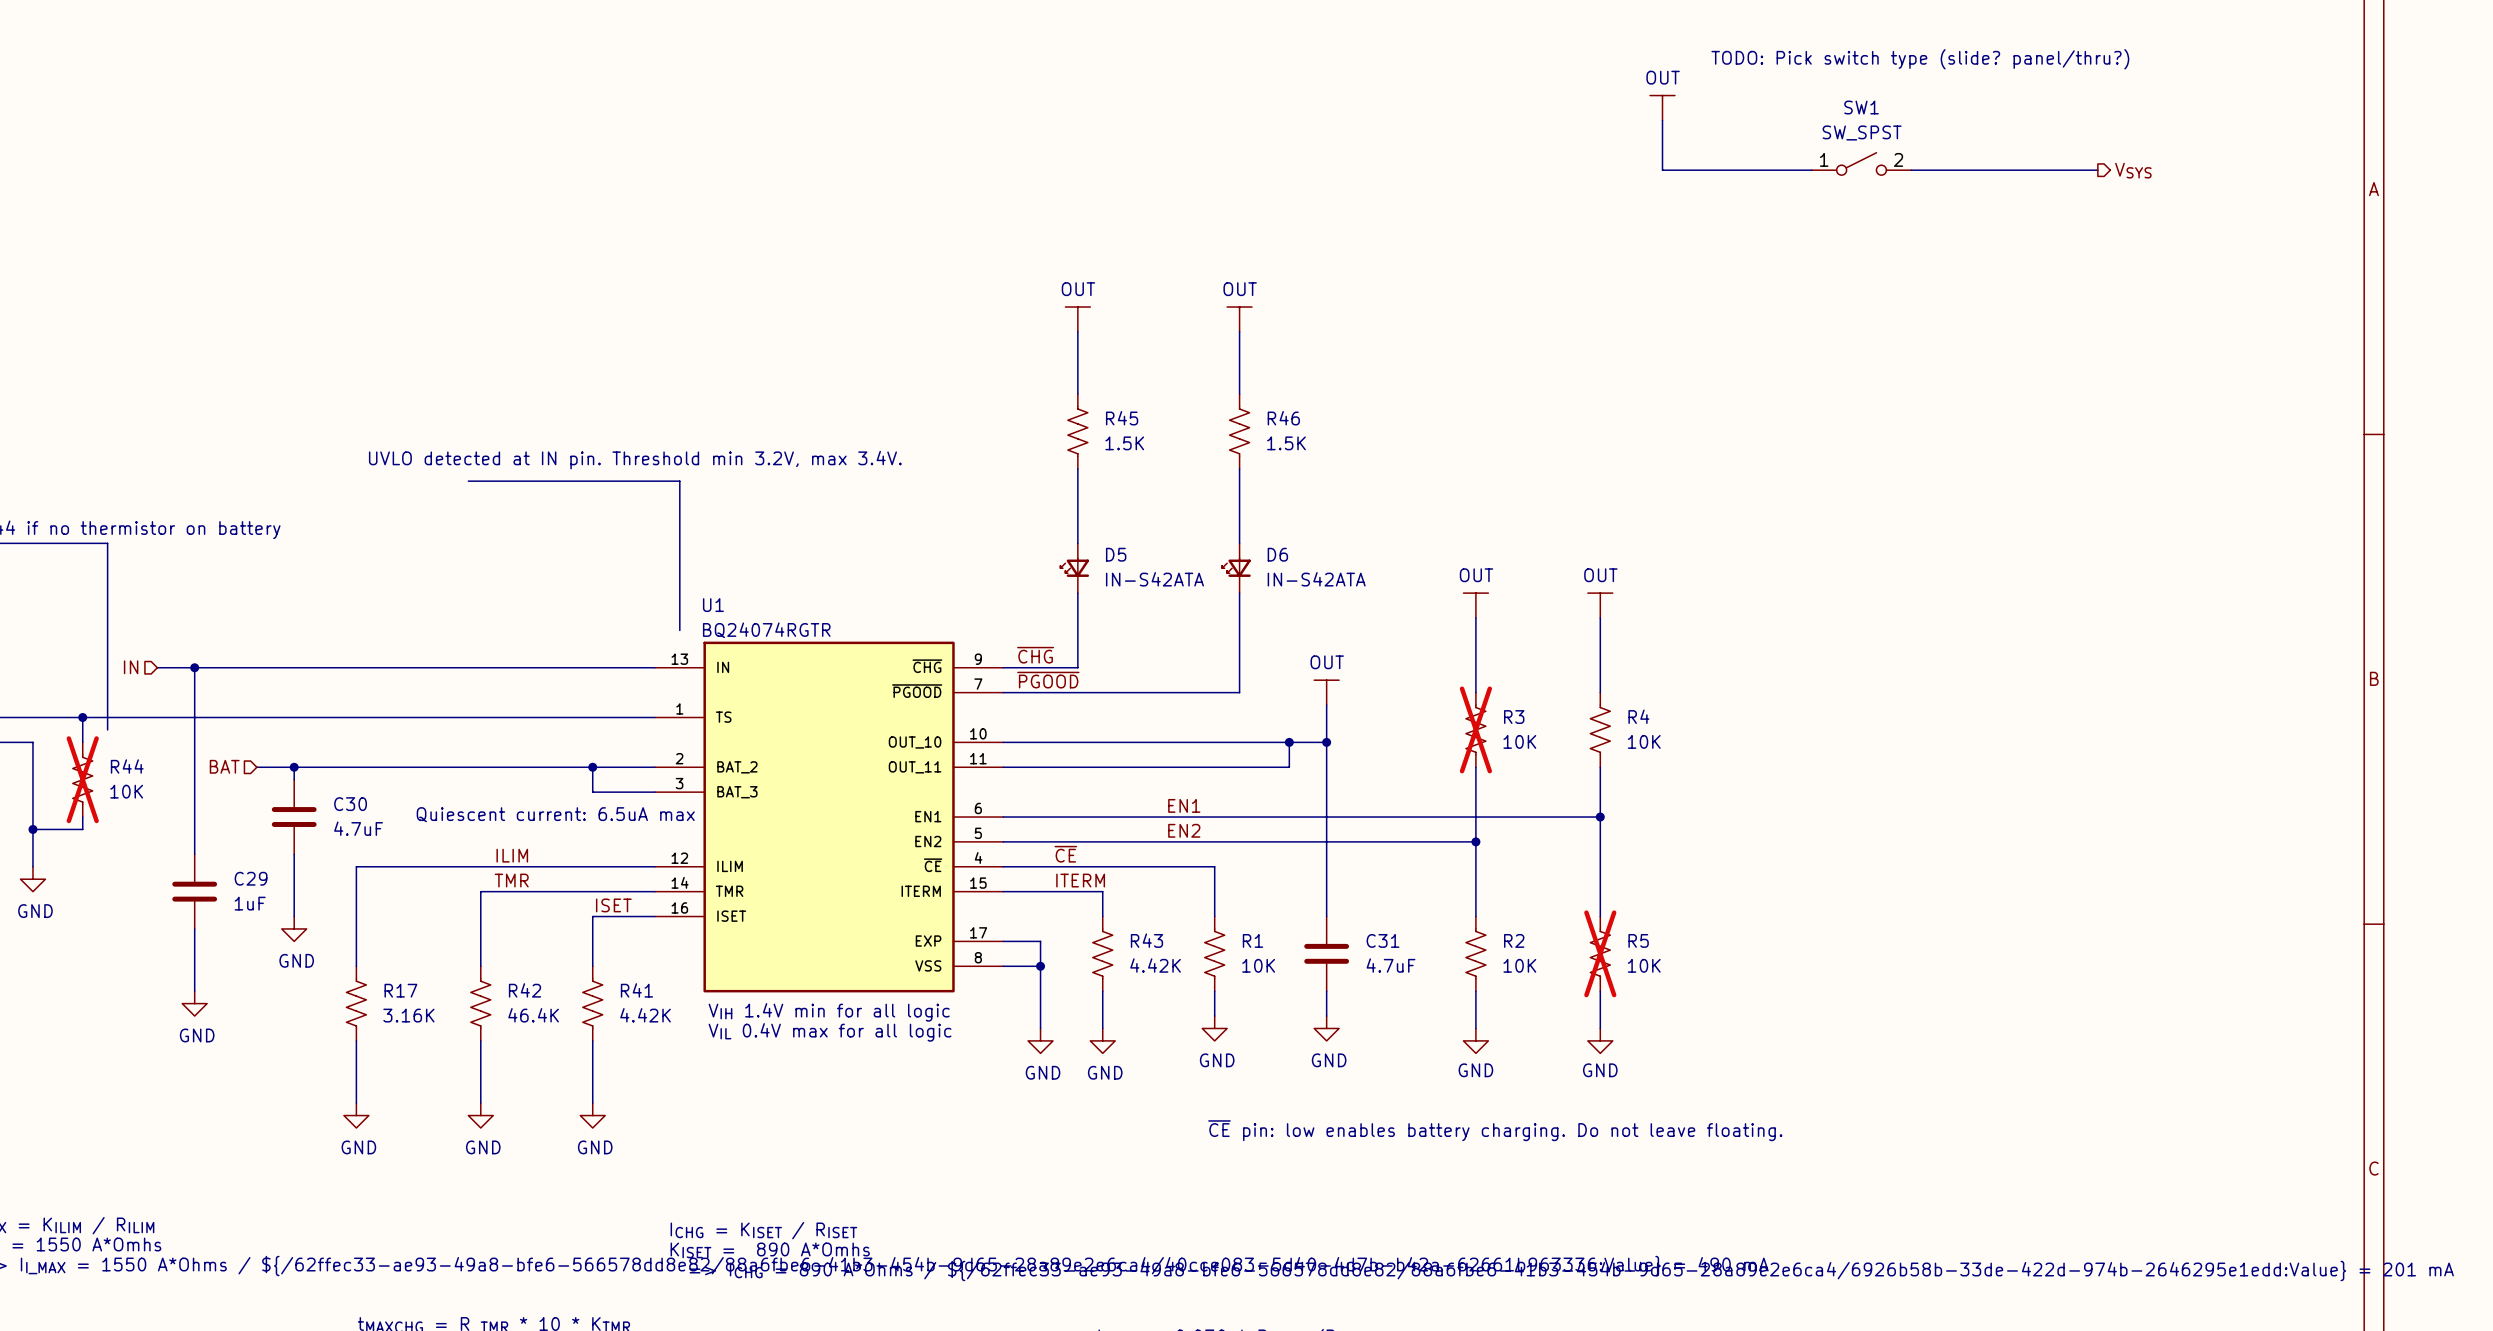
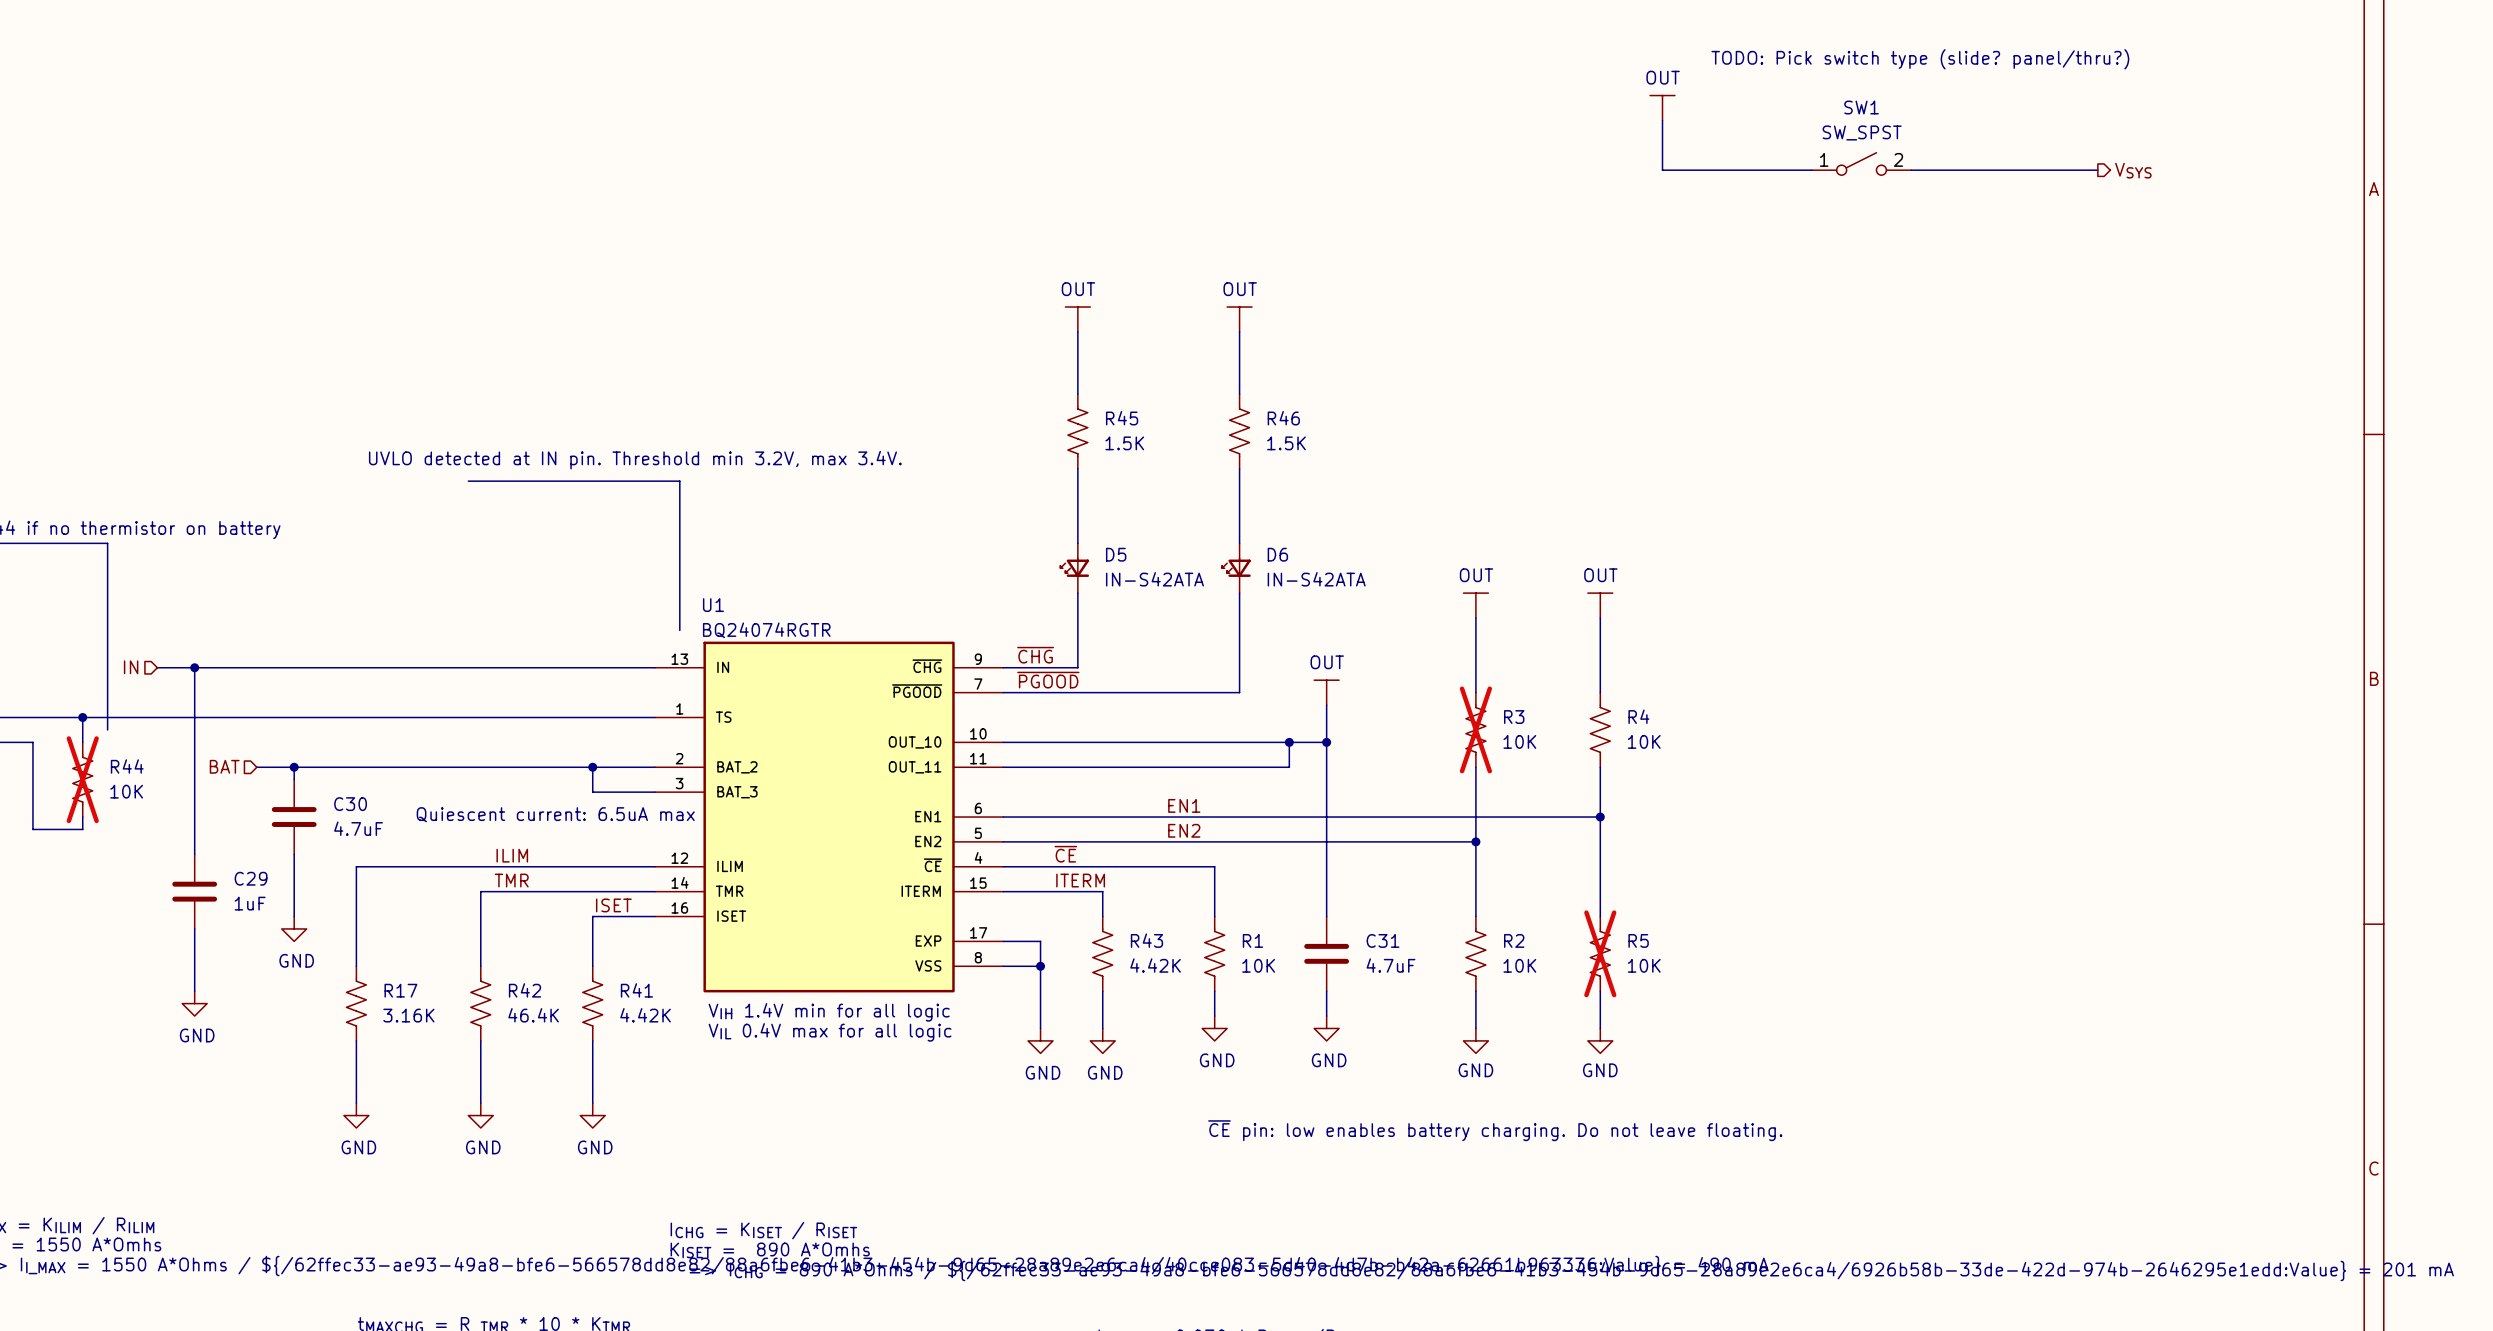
wire: (32, 829) (32, 866) -> none
junction: (32, 829) -> none
power symbol: GND (32, 879) -> none

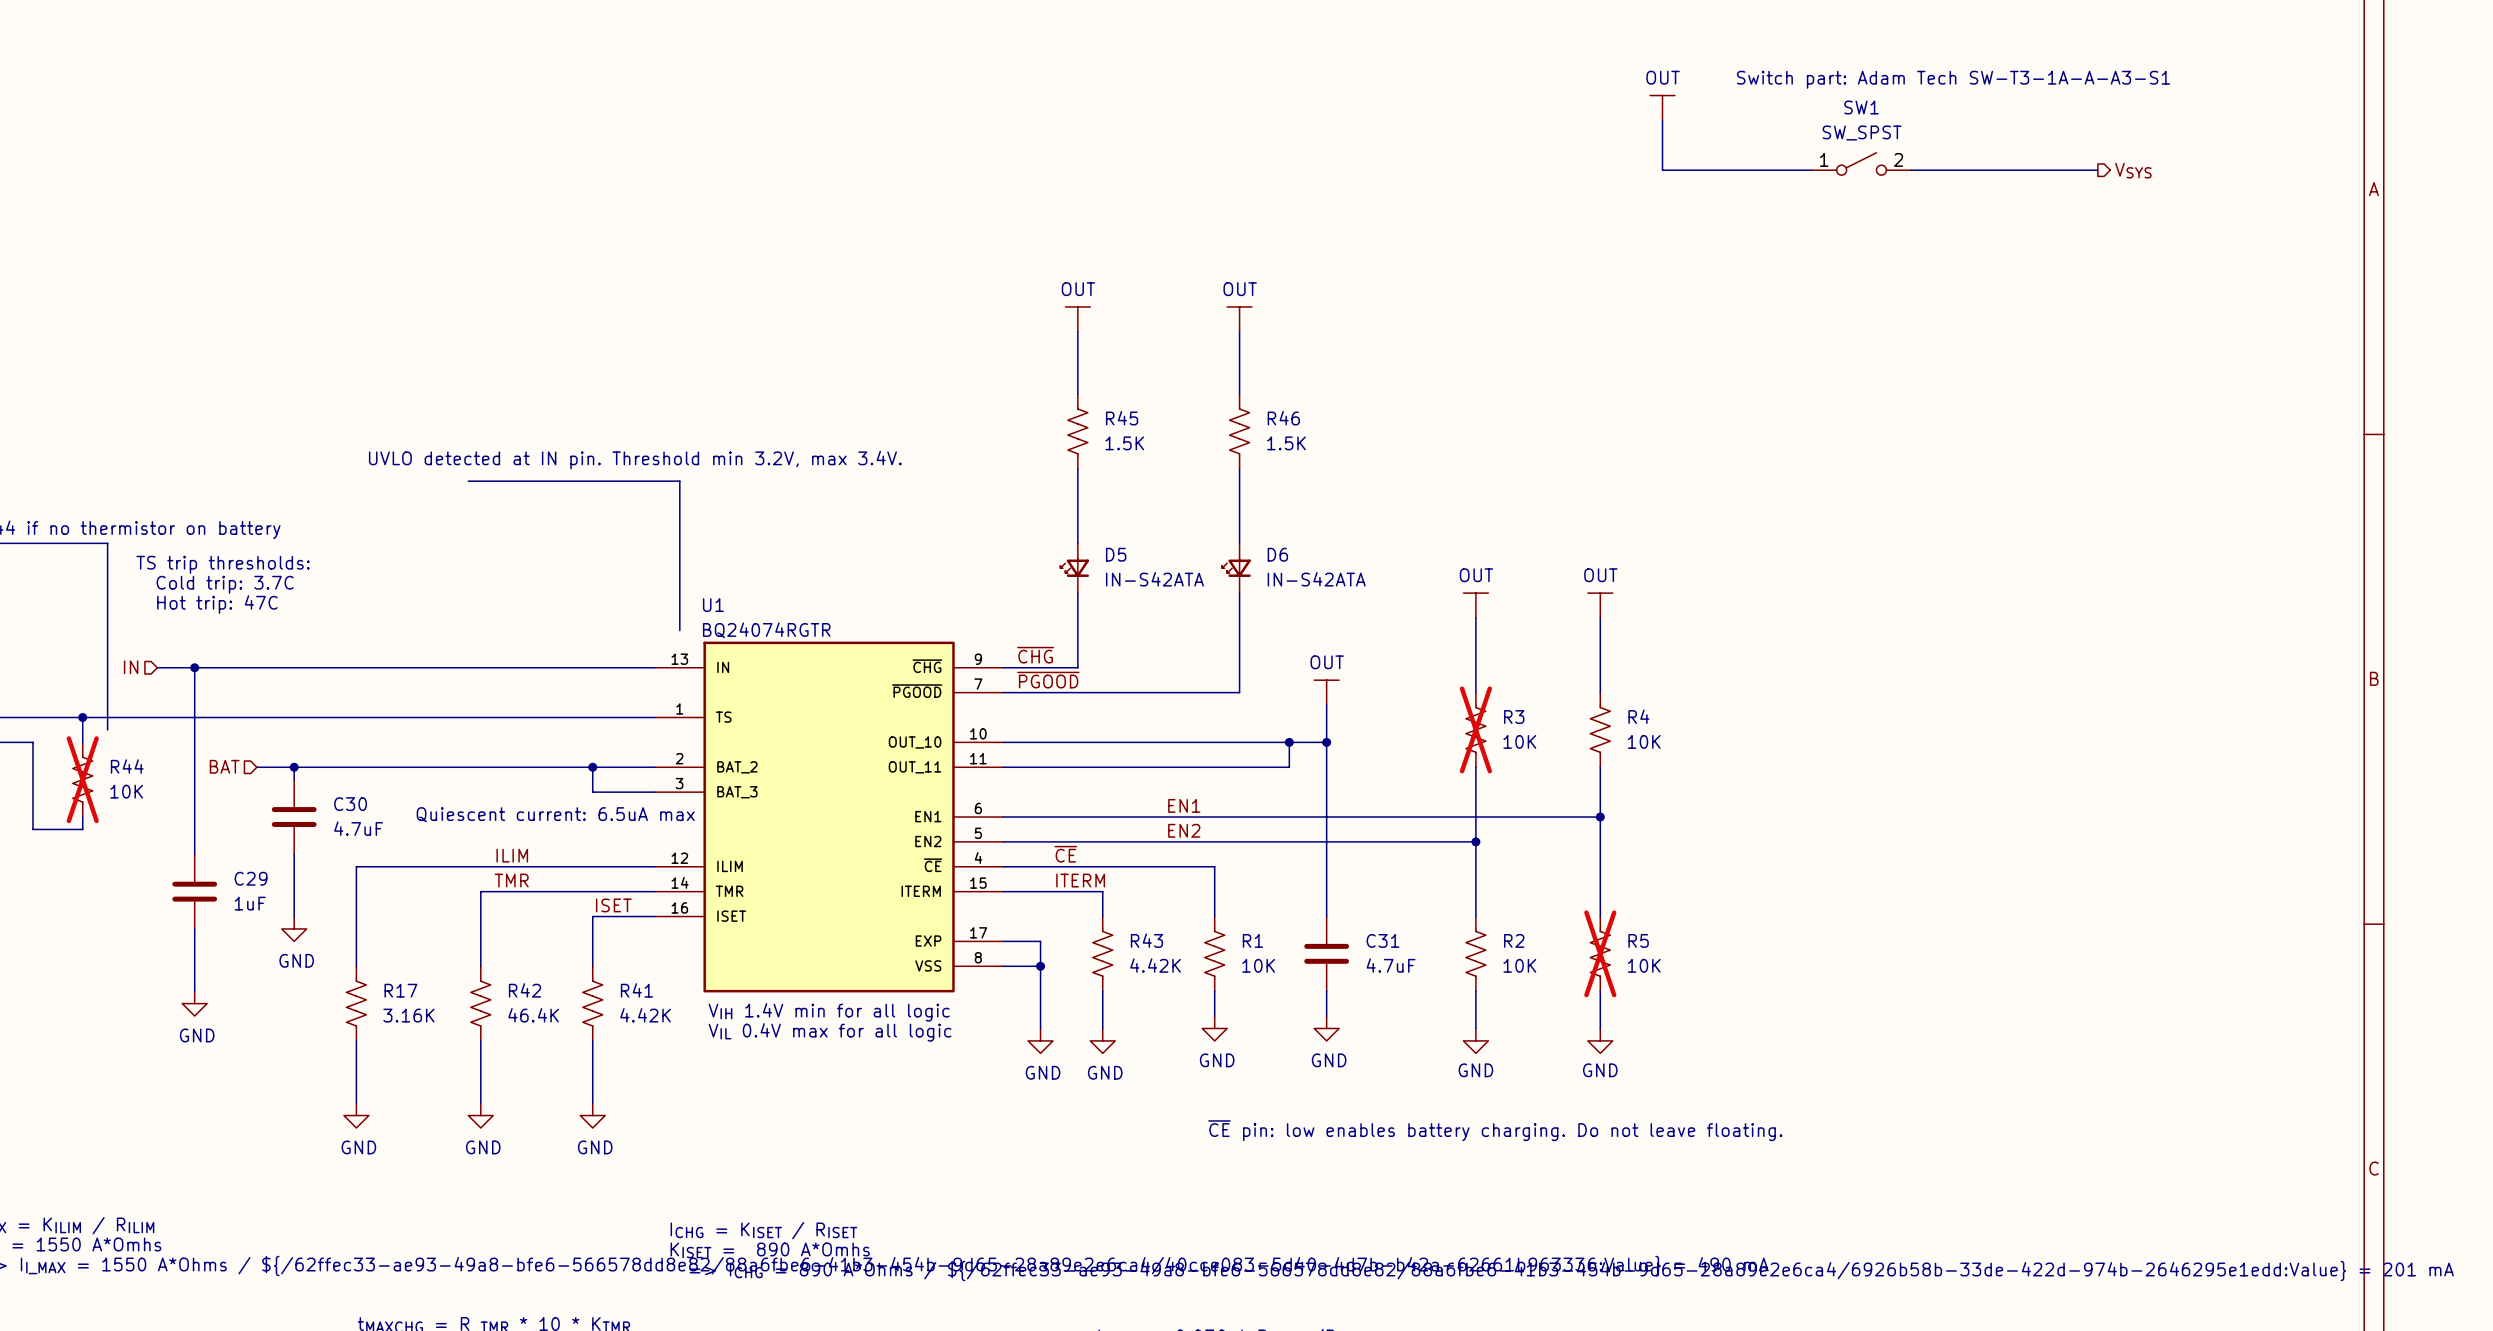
text: TODO: Pick switch type (slide? panel/thru?) (1920, 59) -> none
text: none -> Switch part: Adam Tech SW-T3-1A-A-A3-S1 (1953, 79)
text: none -> TS trip thresholds: (223, 564)
text: none -> Cold trip: 3.7C (225, 584)
text: none -> Hot trip: 47C (217, 604)

